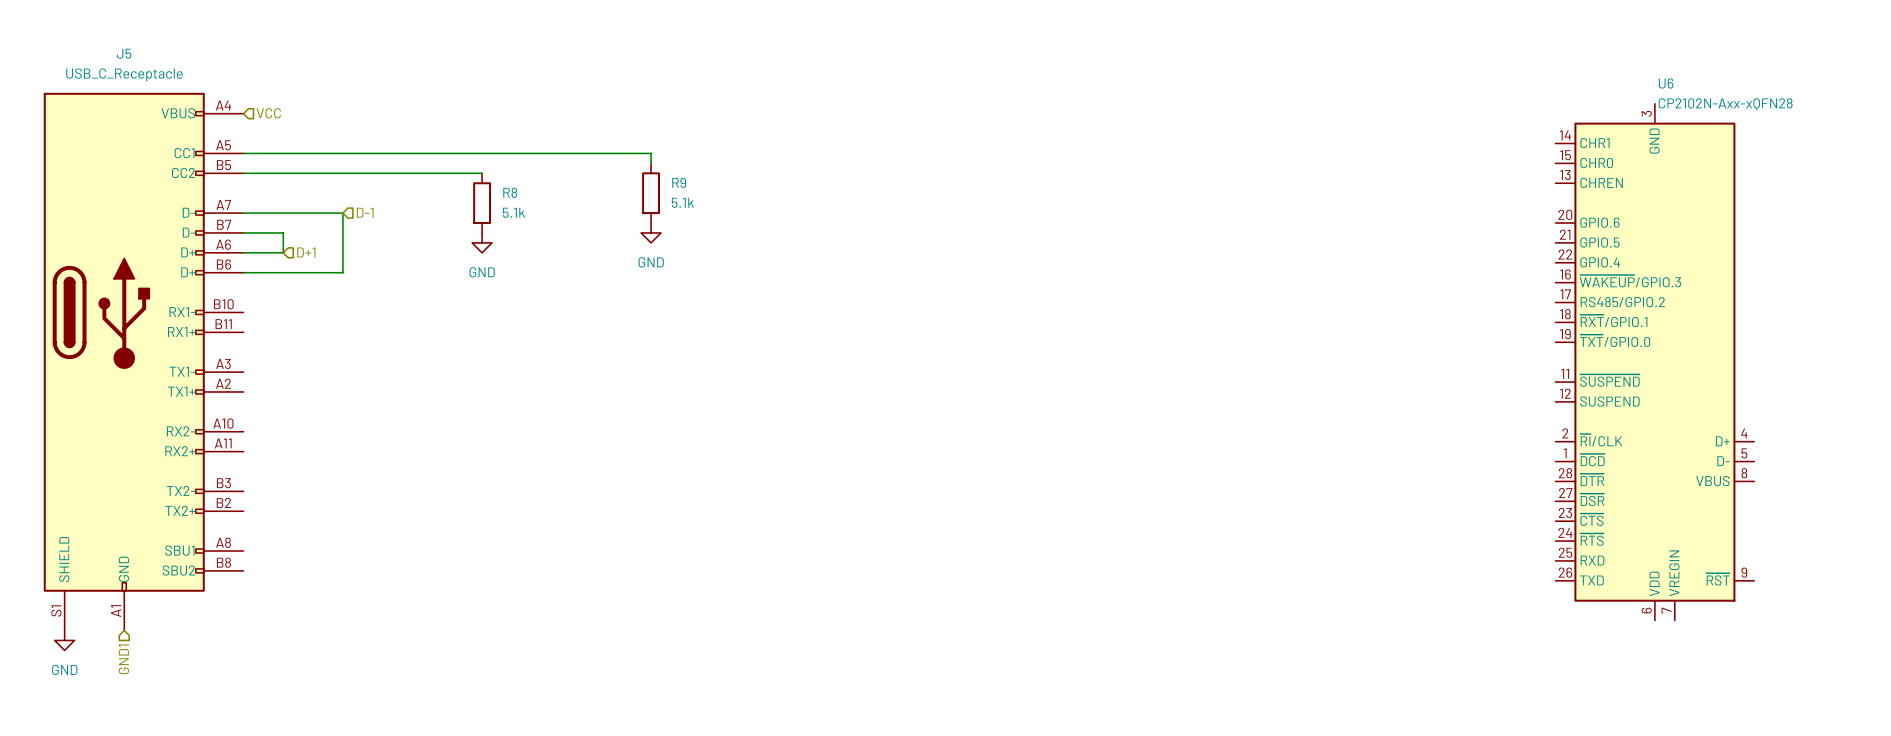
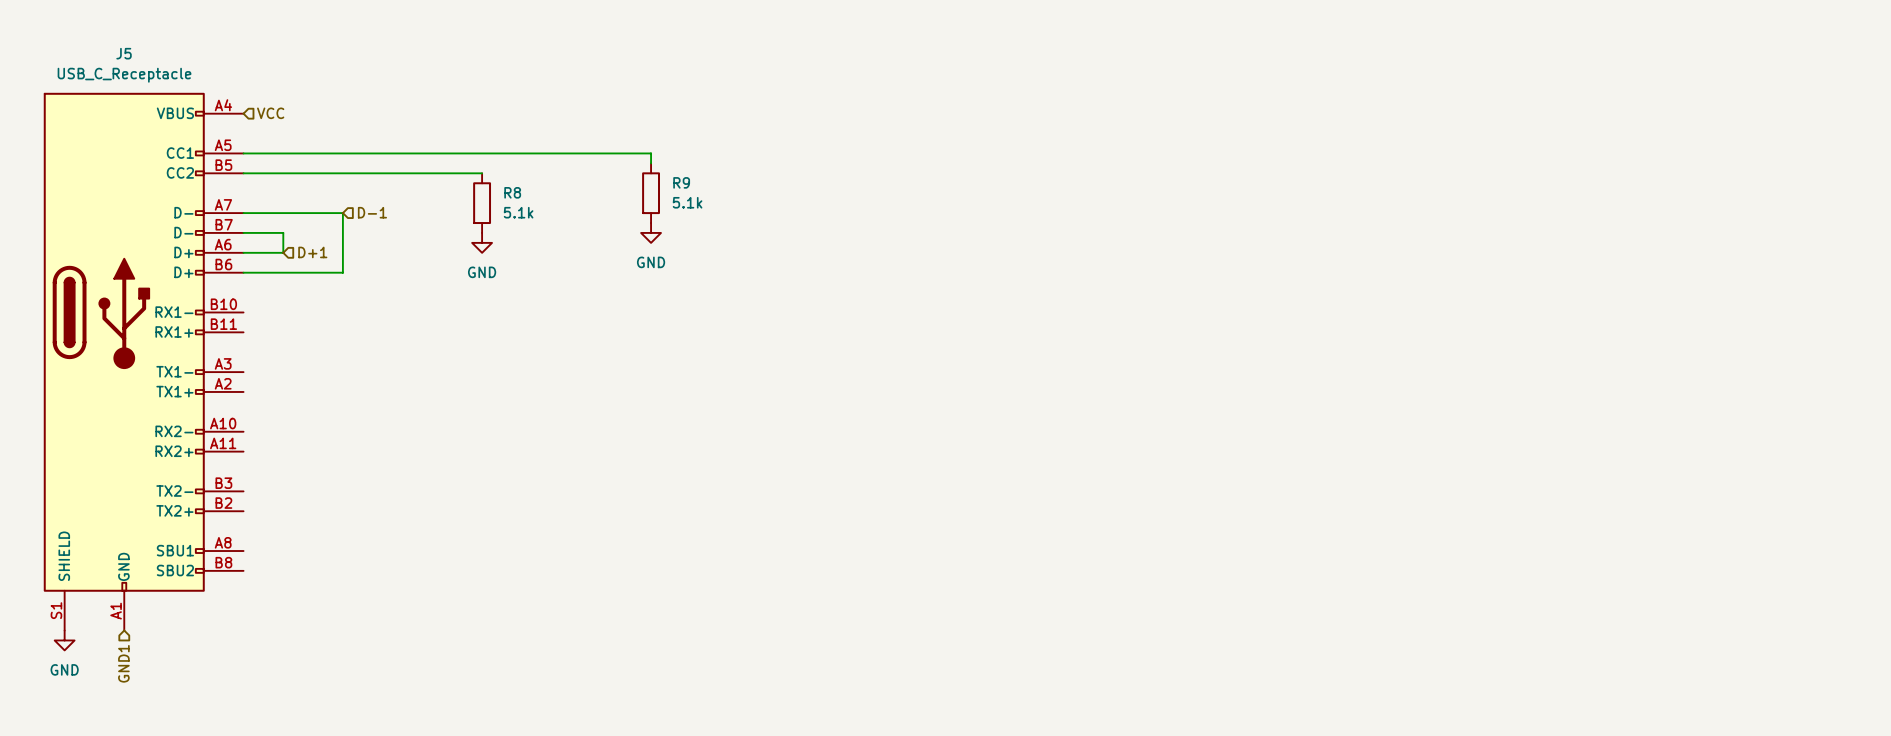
U6: CP2102N-Axx-xQFN28 (1654, 362) -> none

